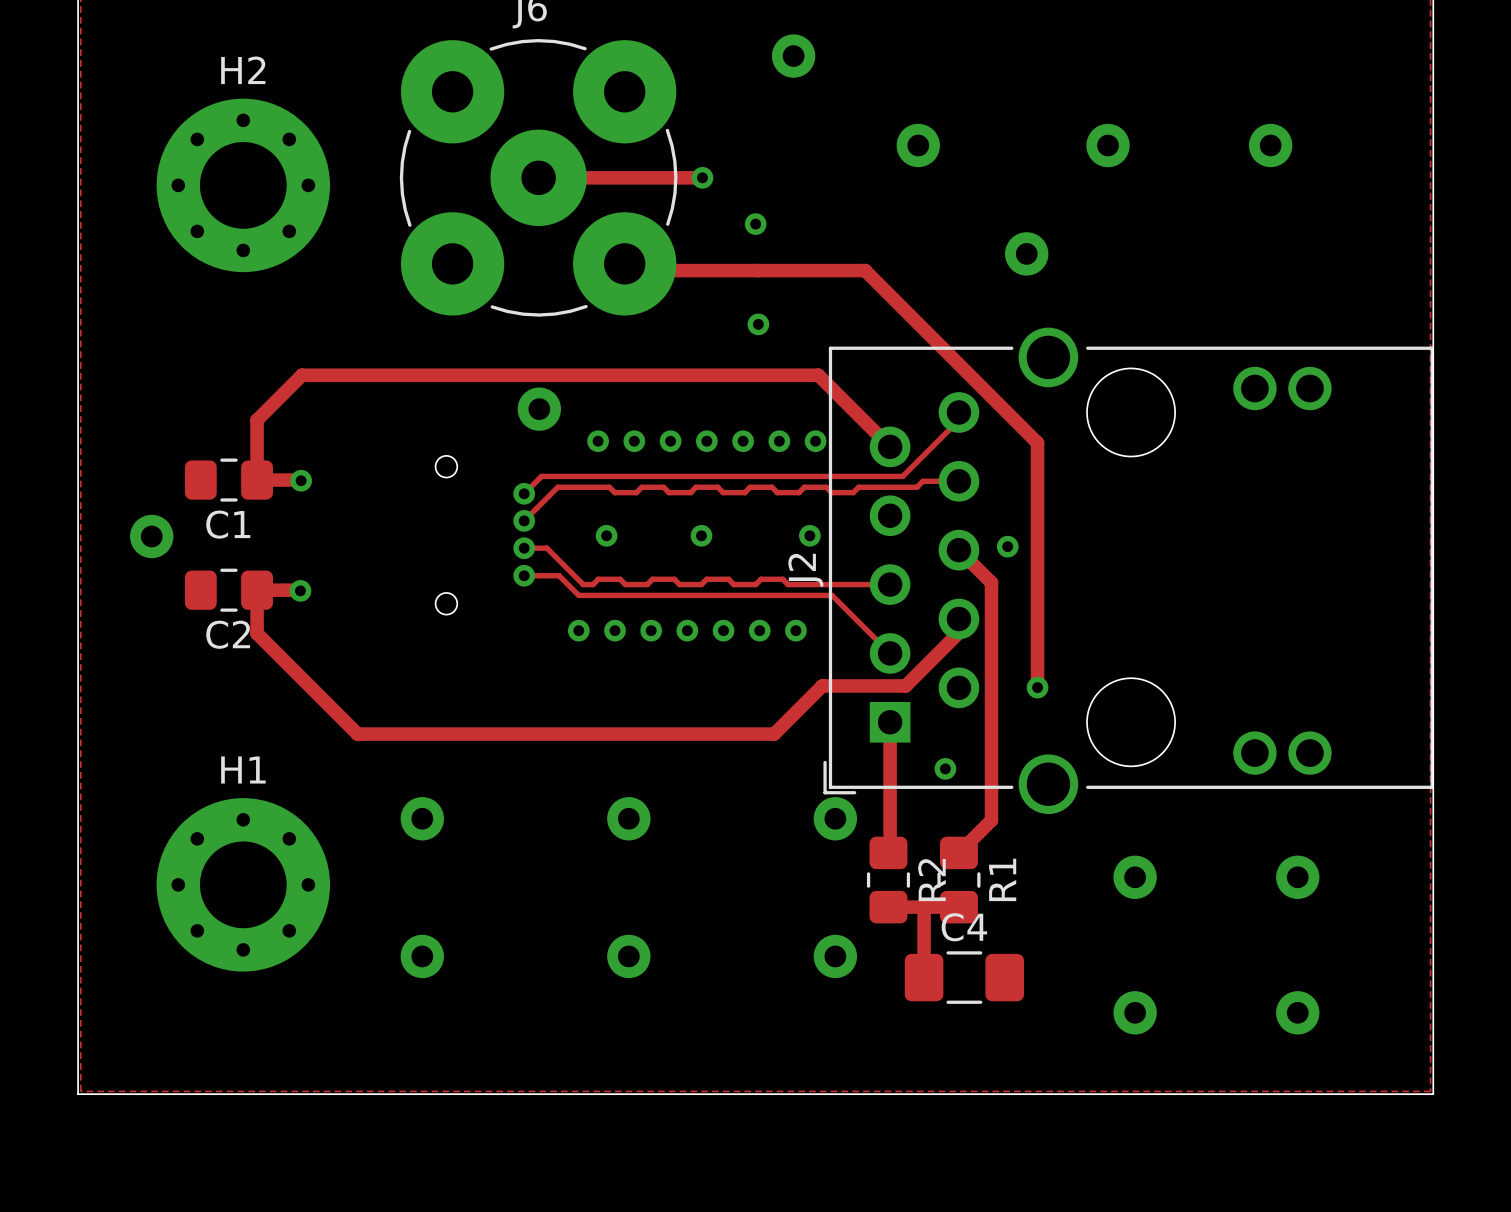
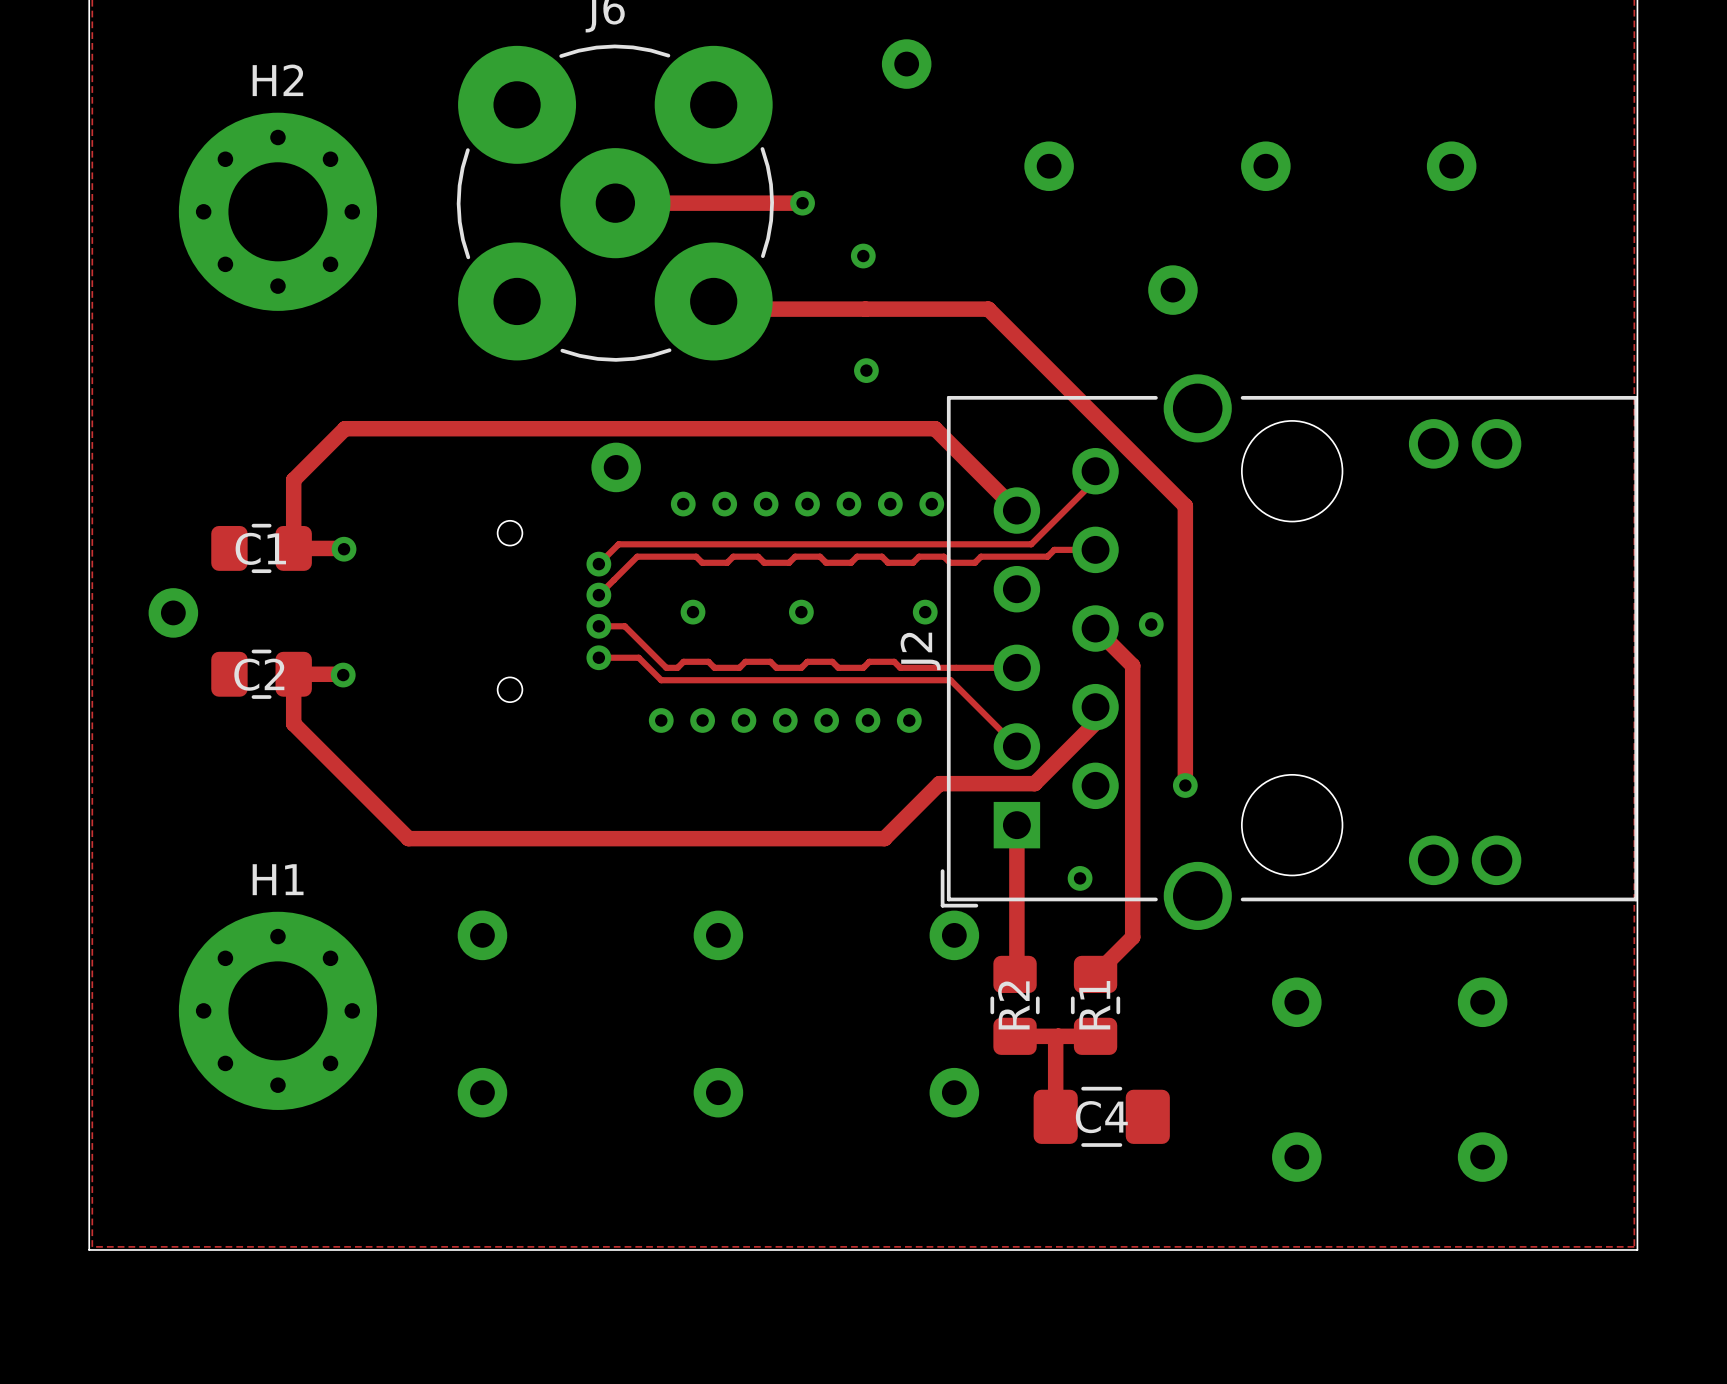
C1 name position: C1 (228, 524) -> C1 (260, 548)
C2 name position: C2 (228, 634) -> C2 (259, 674)
R1 name position: R1 (1002, 879) -> R1 (1094, 1005)
R2 name position: R2 (931, 880) -> R2 (1013, 1005)
C4 name position: C4 (964, 927) -> C4 (1101, 1117)

